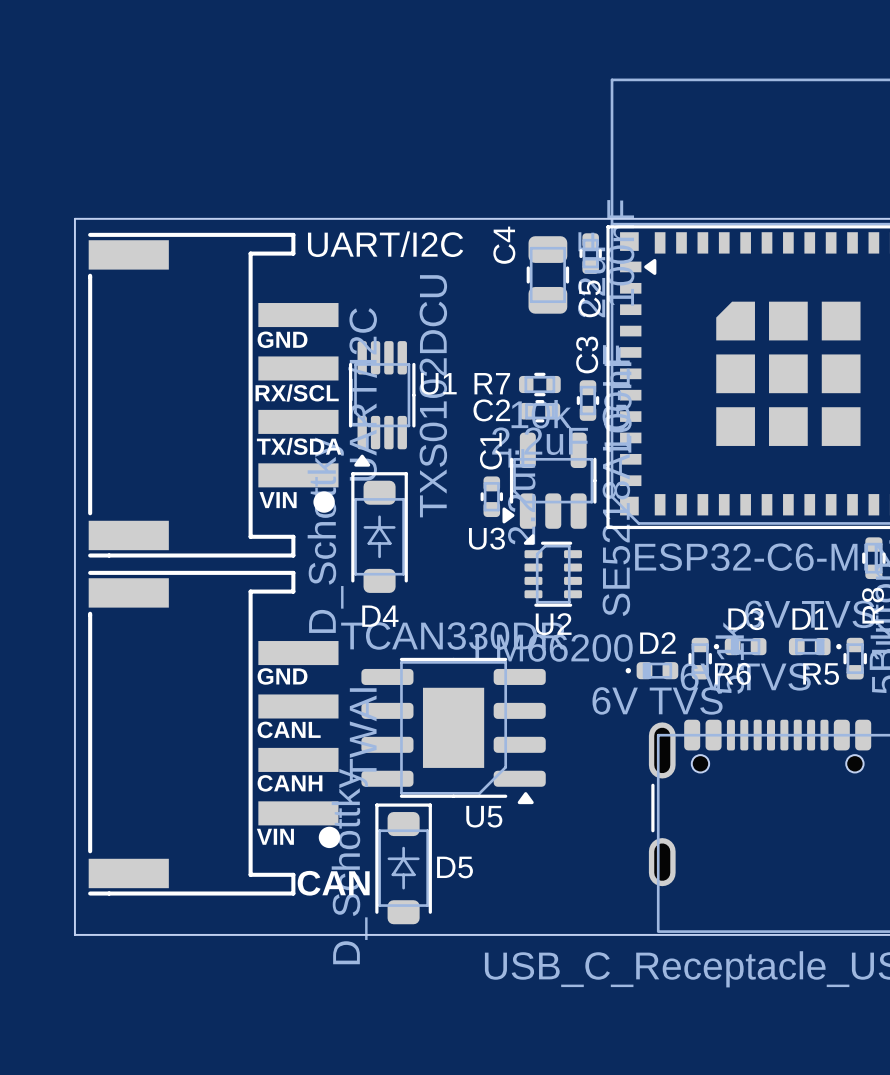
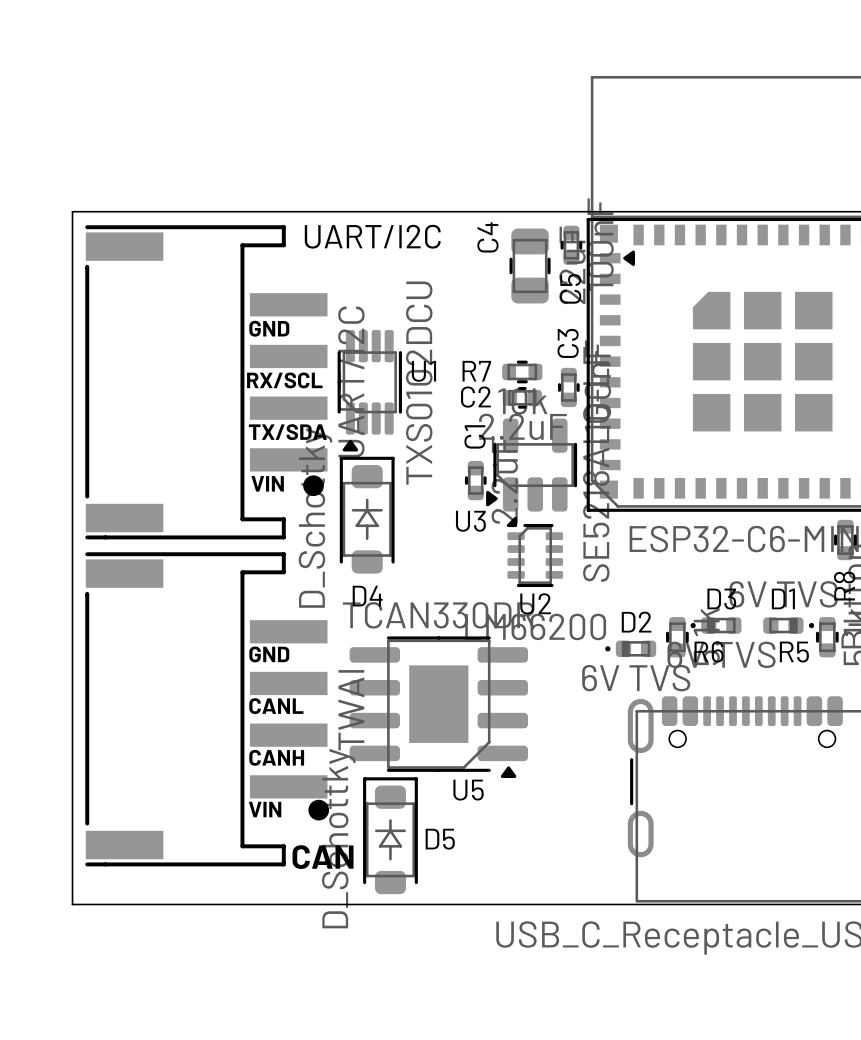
text: CAN (333, 883) -> none
CAN name: none -> CAN (323, 857)

